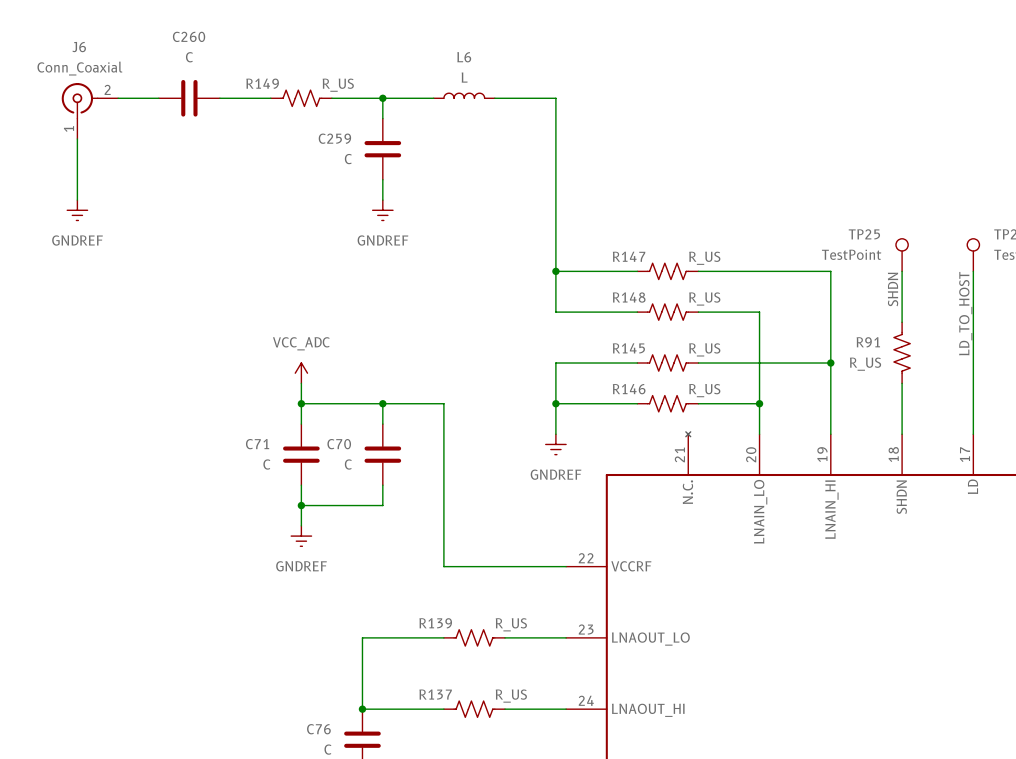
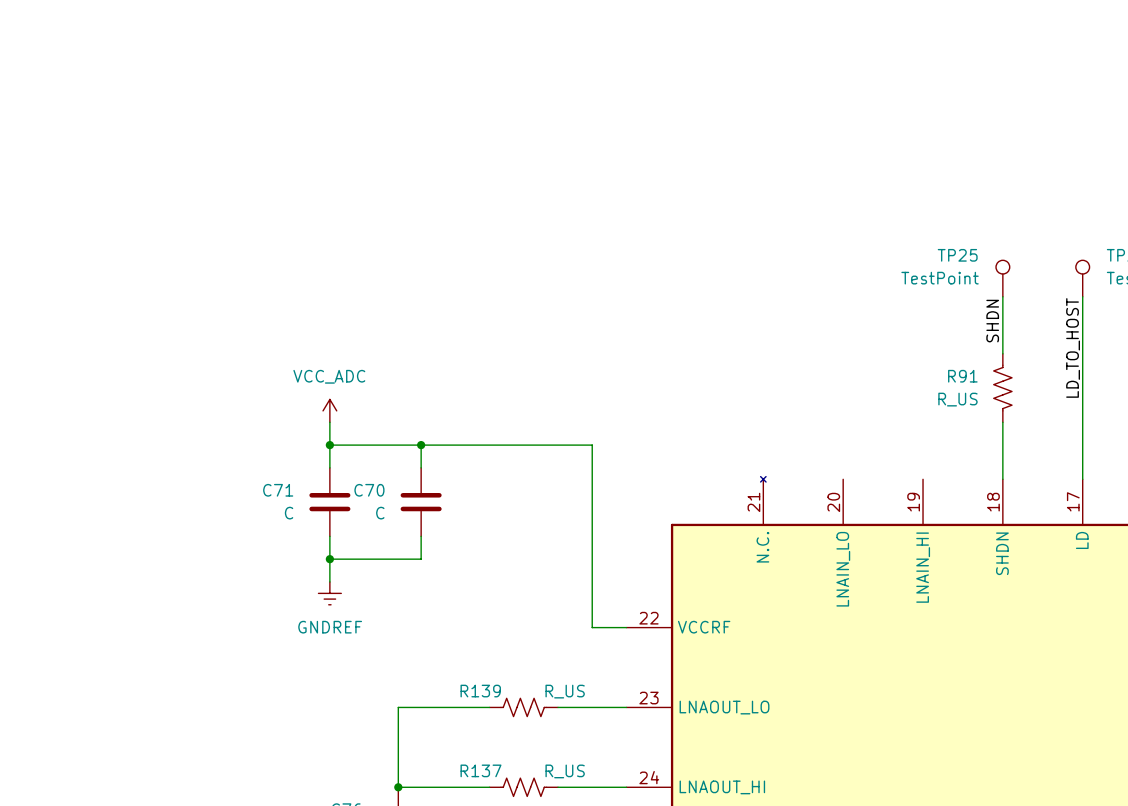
L6: L (464, 95) -> none
wire: (118, 98) (158, 98) -> none
C260: C (189, 98) -> none
wire: (219, 98) (270, 98) -> none
R149: R_US (301, 98) -> none
wire: (331, 98) (433, 98) -> none
wire: (382, 98) (382, 118) -> none
junction: (382, 98) -> none
wire: (494, 98) (555, 98) (555, 312) (637, 312) -> none
J6: Conn_Coaxial (89, 111) -> none
wire: (77, 139) (77, 200) -> none
C259: C (382, 149) -> none
wire: (382, 179) (382, 200) -> none
power symbol: GNDREF (77, 210) -> none
power symbol: GNDREF (382, 210) -> none
wire: (555, 271) (637, 271) -> none
junction: (555, 271) -> none
R147: R_US (667, 271) -> none
wire: (698, 271) (830, 271) (830, 434) -> none
R148: R_US (667, 312) -> none
wire: (698, 312) (759, 312) (759, 434) -> none
wire: (637, 363) (555, 363) (555, 434) -> none
R145: R_US (667, 363) -> none
wire: (698, 363) (830, 363) -> none
junction: (830, 363) -> none
wire: (443, 403) (443, 566) (535, 566) -> (489, 445) (592, 445) (592, 627)
wire: (555, 403) (637, 403) -> none
junction: (555, 403) -> none
R146: R_US (667, 403) -> none
wire: (698, 403) (759, 403) -> none
junction: (759, 403) -> none
power symbol: GNDREF (555, 444) -> none

